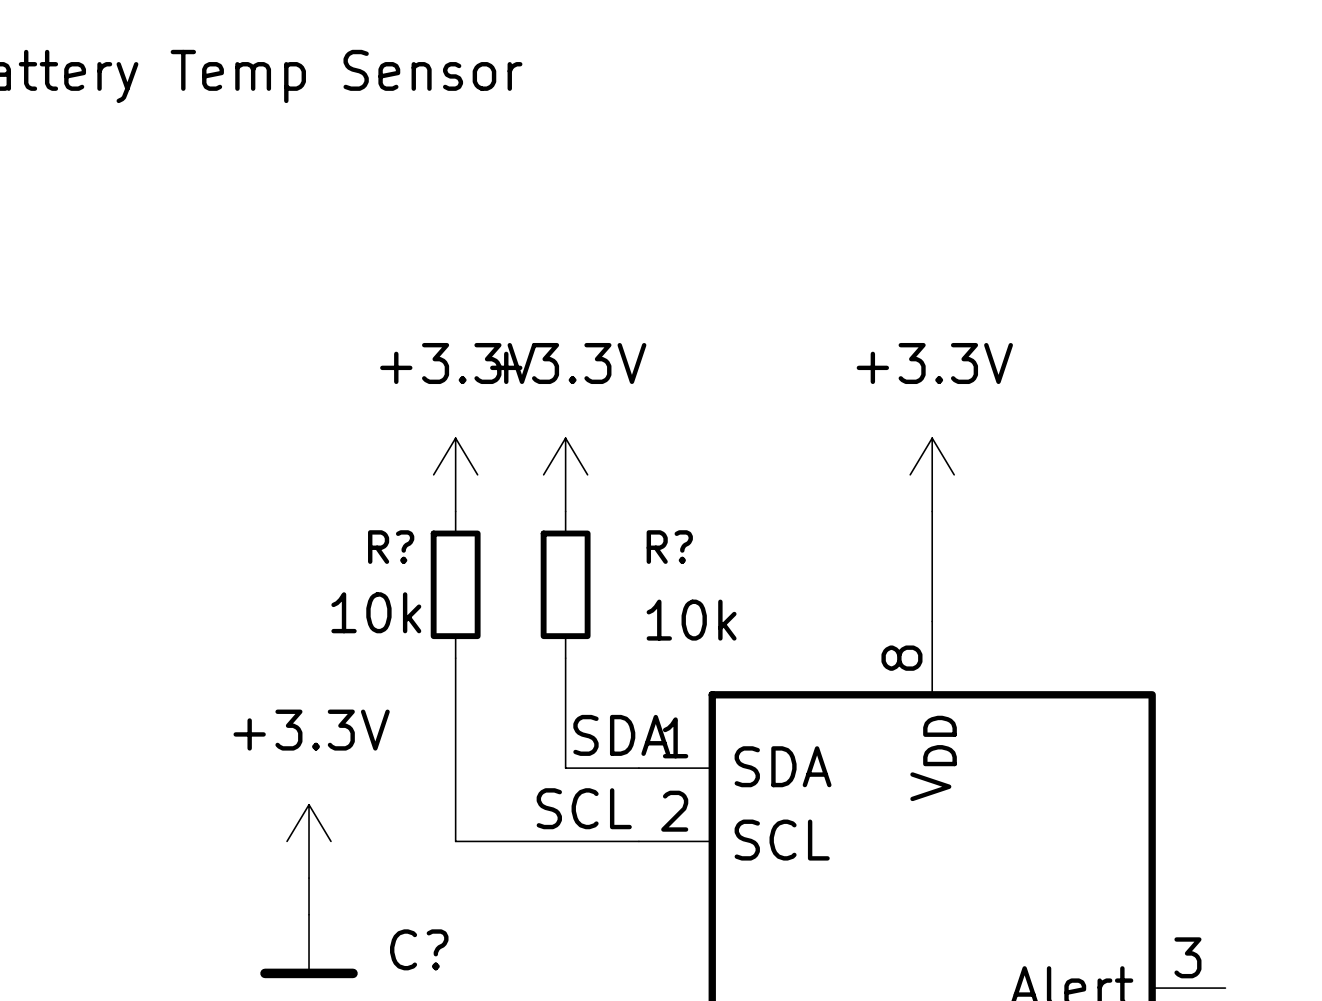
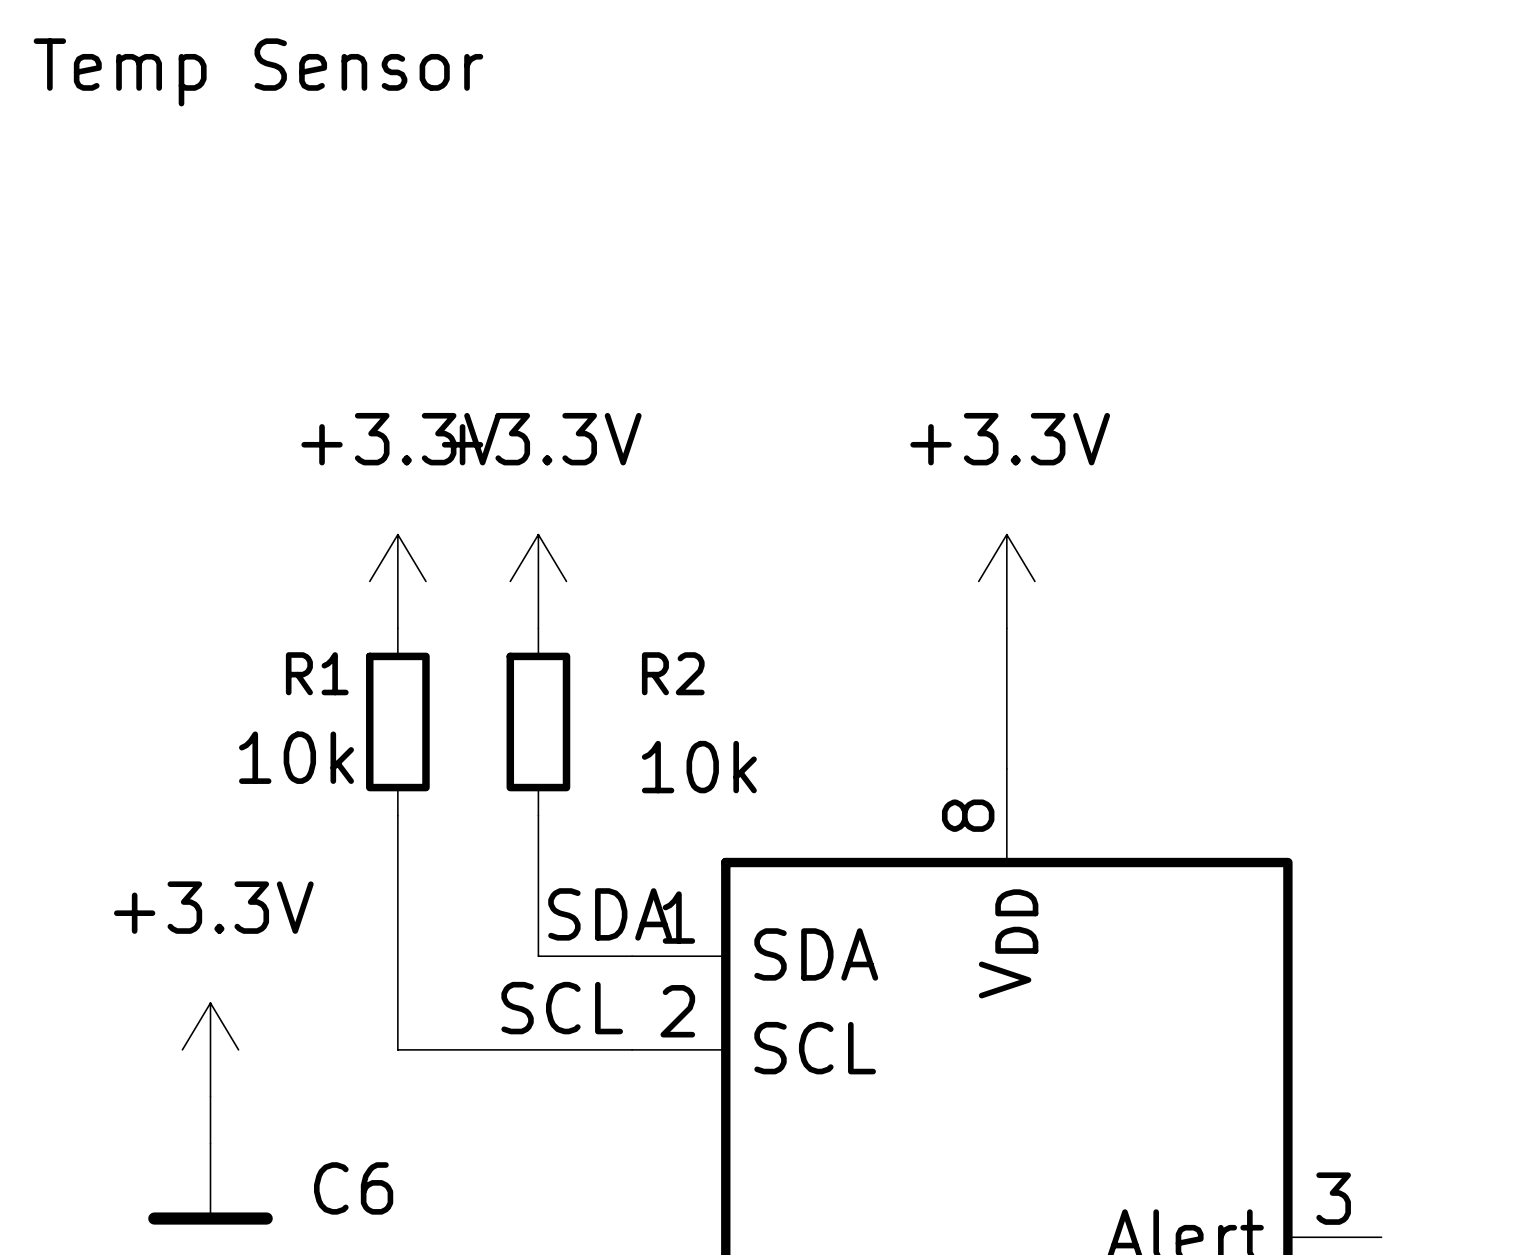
R? name: R? (391, 547) -> R1 (317, 673)
R? name: R? (669, 547) -> R2 (673, 673)
C? name: C? (419, 949) -> C6 (353, 1188)

